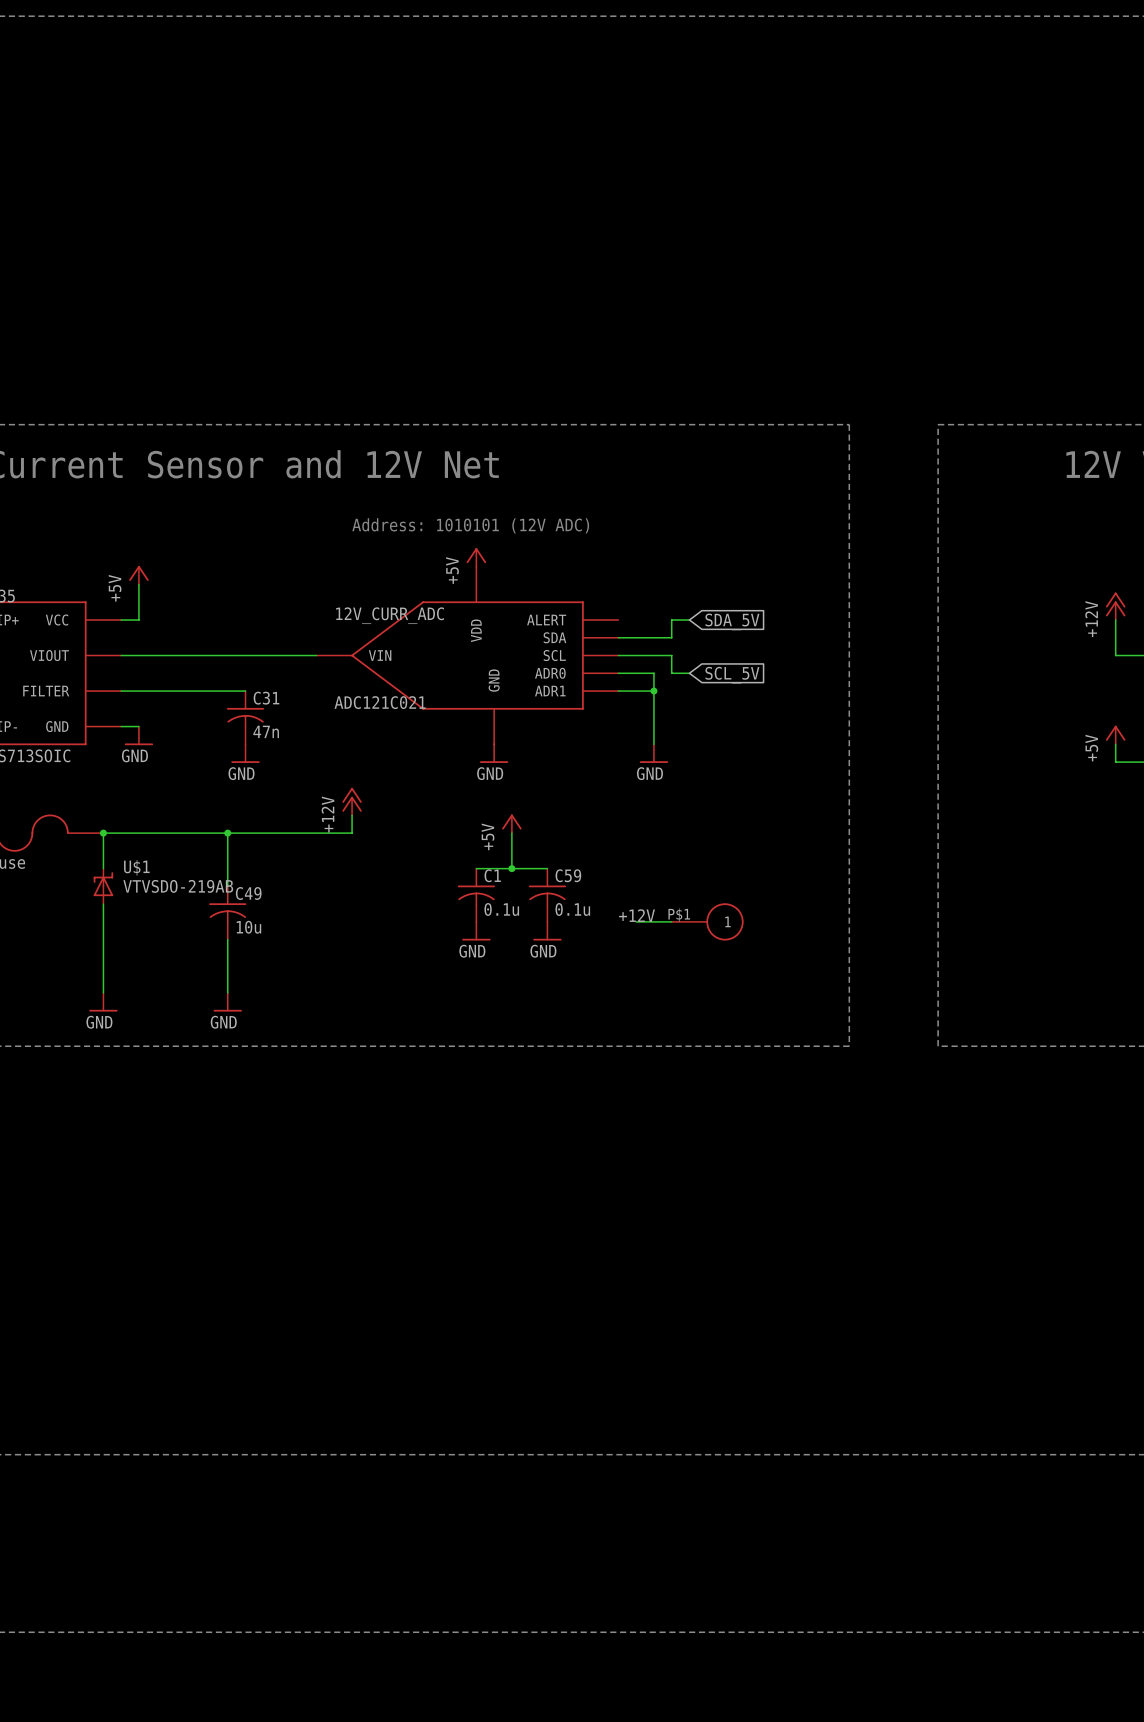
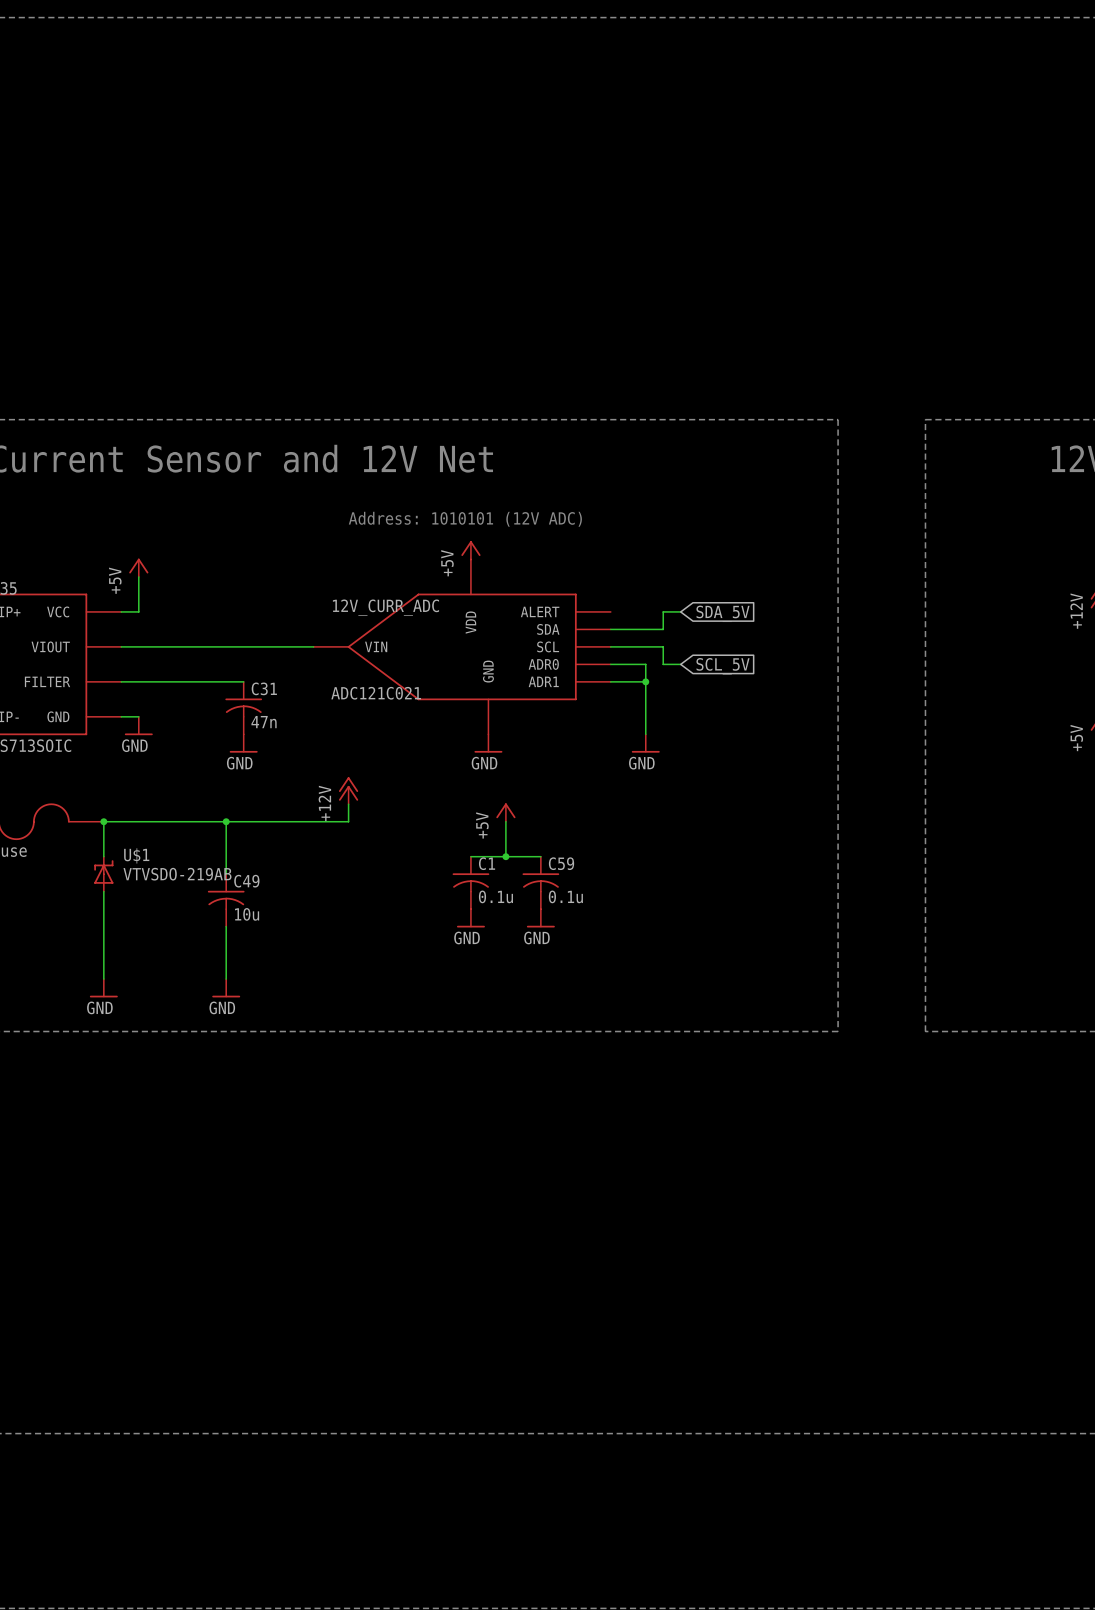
label: +12V (637, 915) -> none
wire: (636, 921) (671, 921) -> none
part: (707, 921) -> none

